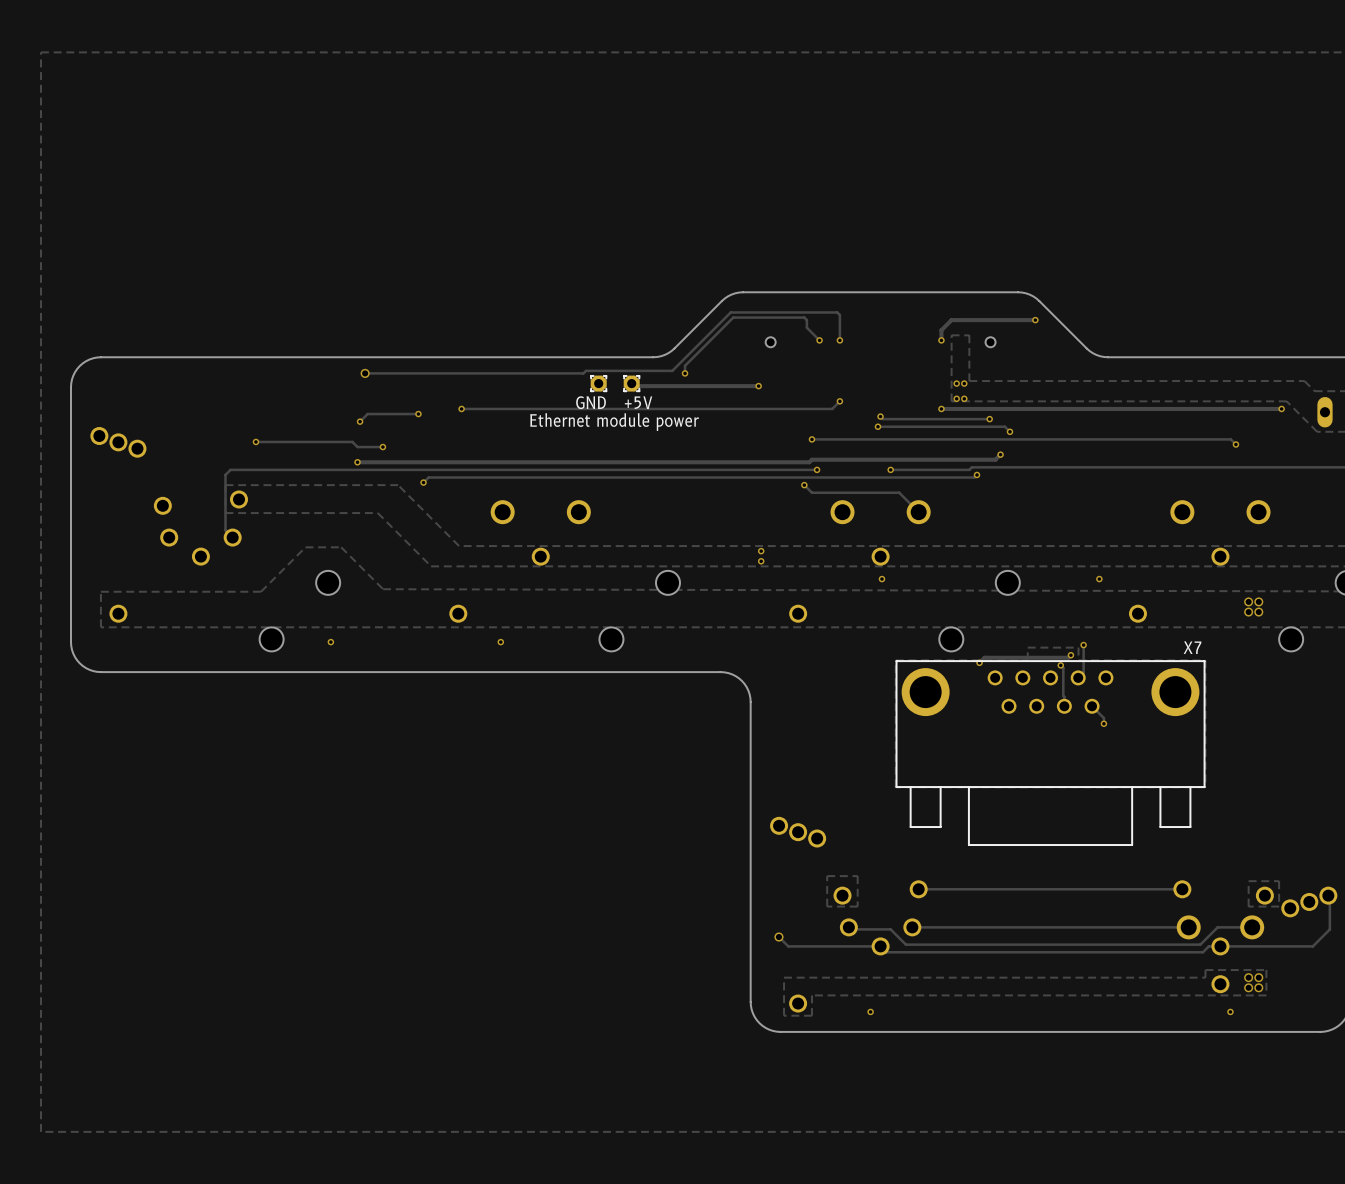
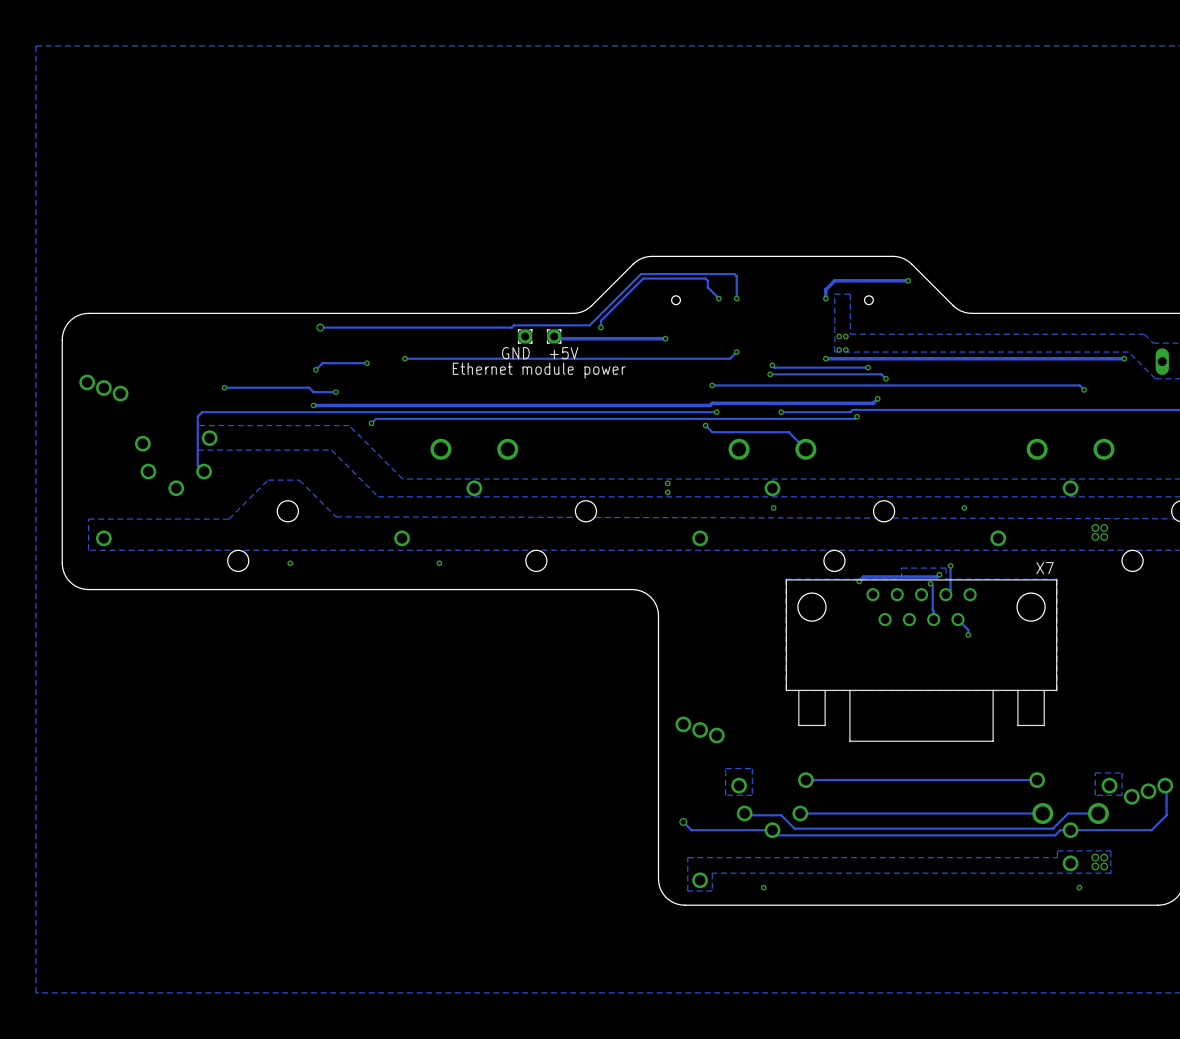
X7 footprint: [895, 660, 1206, 846] -> [785, 579, 1058, 742]

